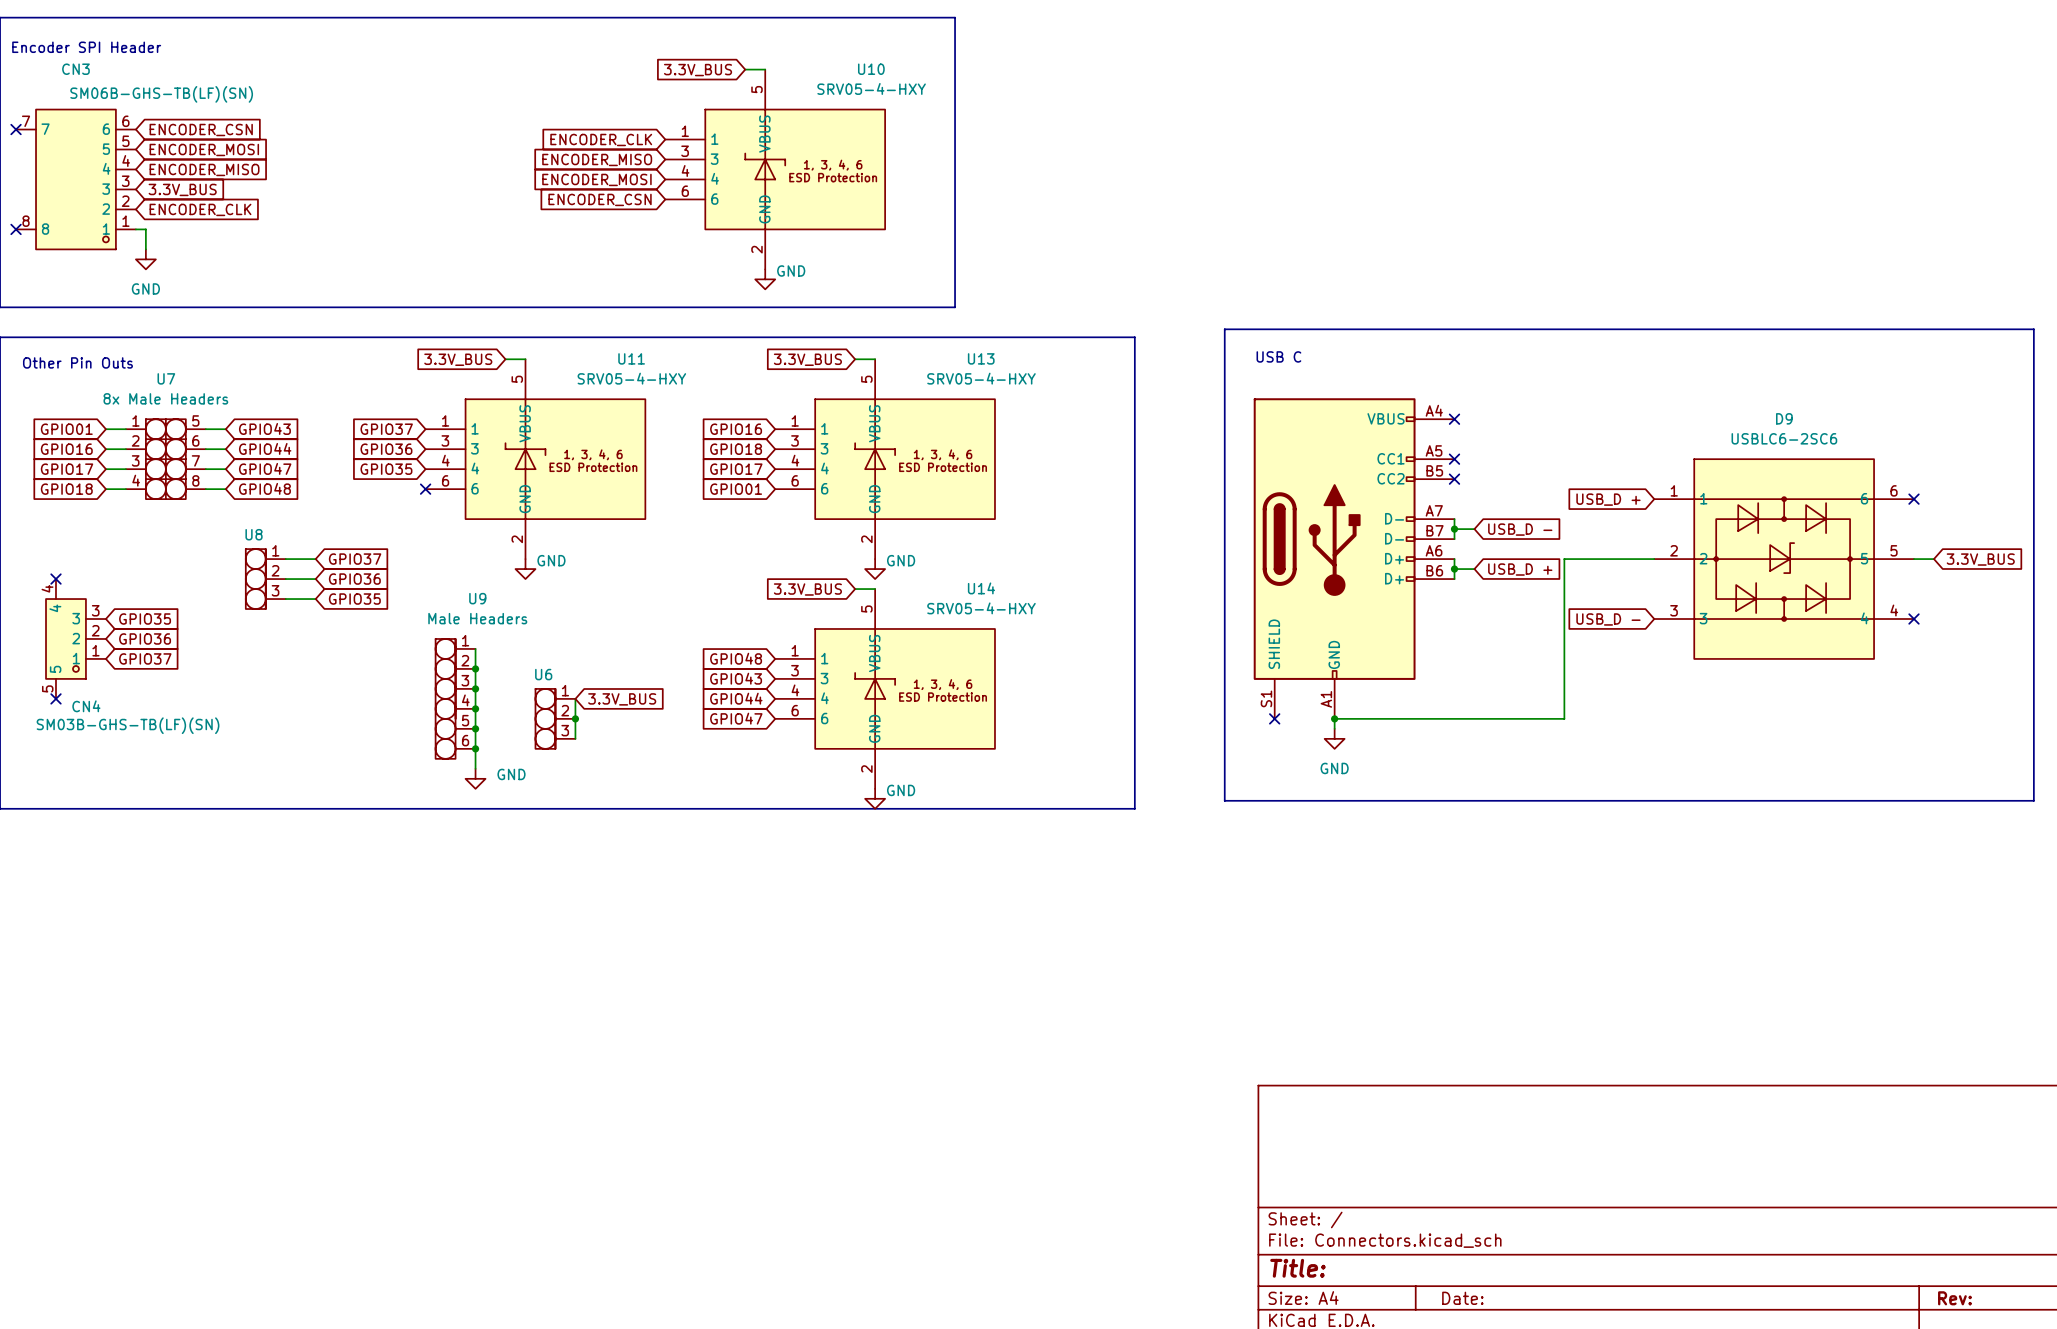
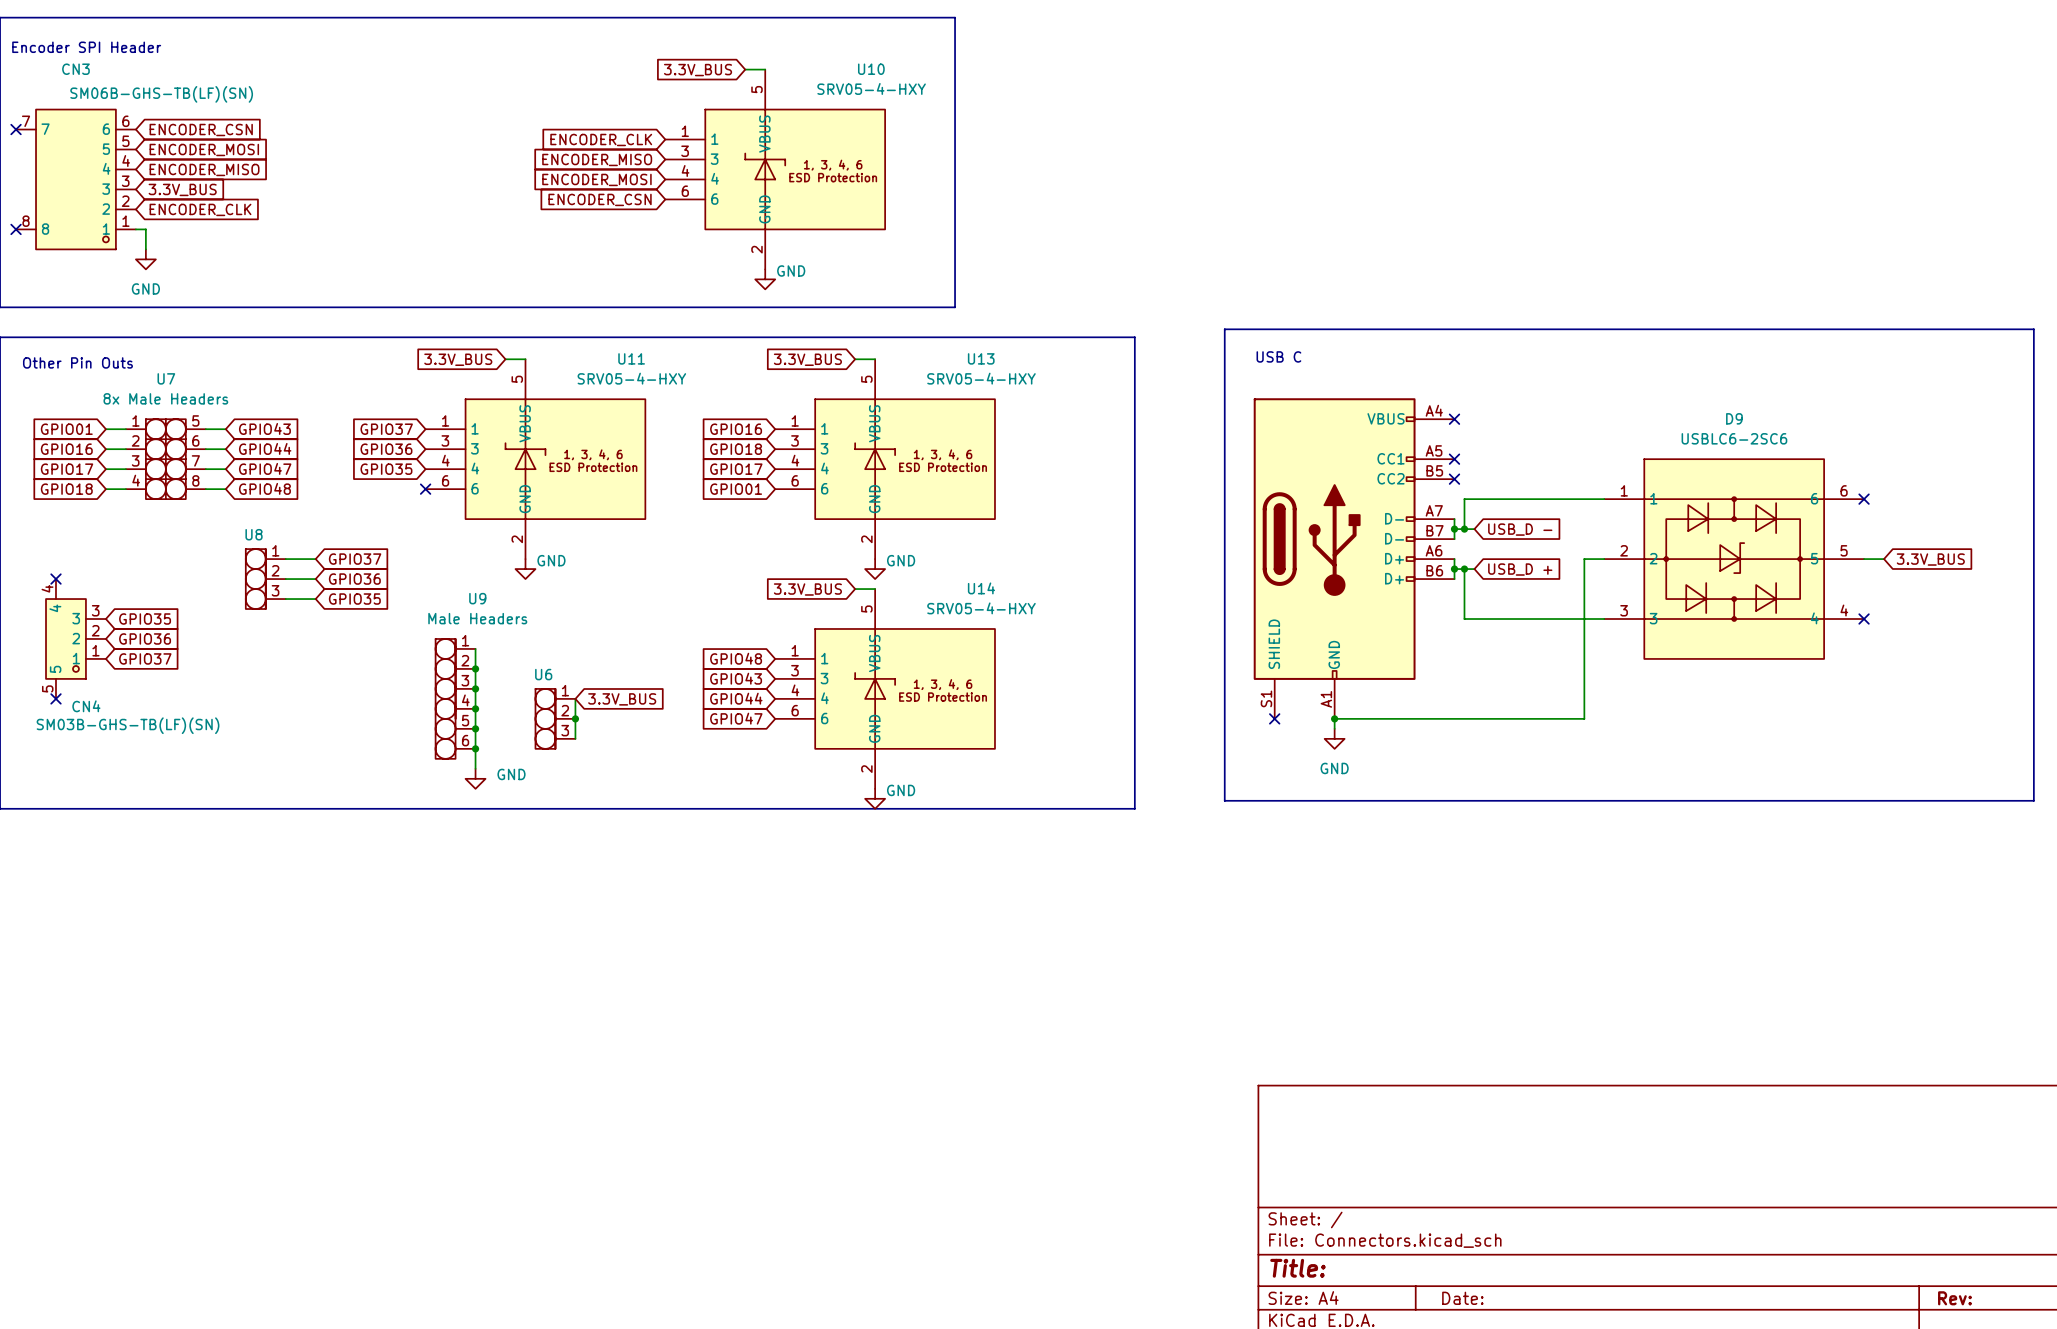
wire: none -> (1604, 499) (1464, 499) (1464, 529)
global label: USB_D + (1608, 499) -> none
no-connect mark: none -> (1864, 499)
no-connect mark: (1914, 499) -> none
junction: none -> (1464, 529)
wire: (1584, 559) (1564, 559) (1564, 718) -> (1584, 559) (1584, 718) (1564, 718)
D9 position: (1784, 559) -> (1734, 559)
global label position: 3.3V_BUS (1980, 559) -> 3.3V_BUS (1930, 559)
wire: none -> (1464, 569) (1464, 619) (1604, 619)
junction: none -> (1464, 569)
global label: USB_D - (1608, 619) -> none
no-connect mark: none -> (1864, 619)
no-connect mark: (1914, 619) -> none

